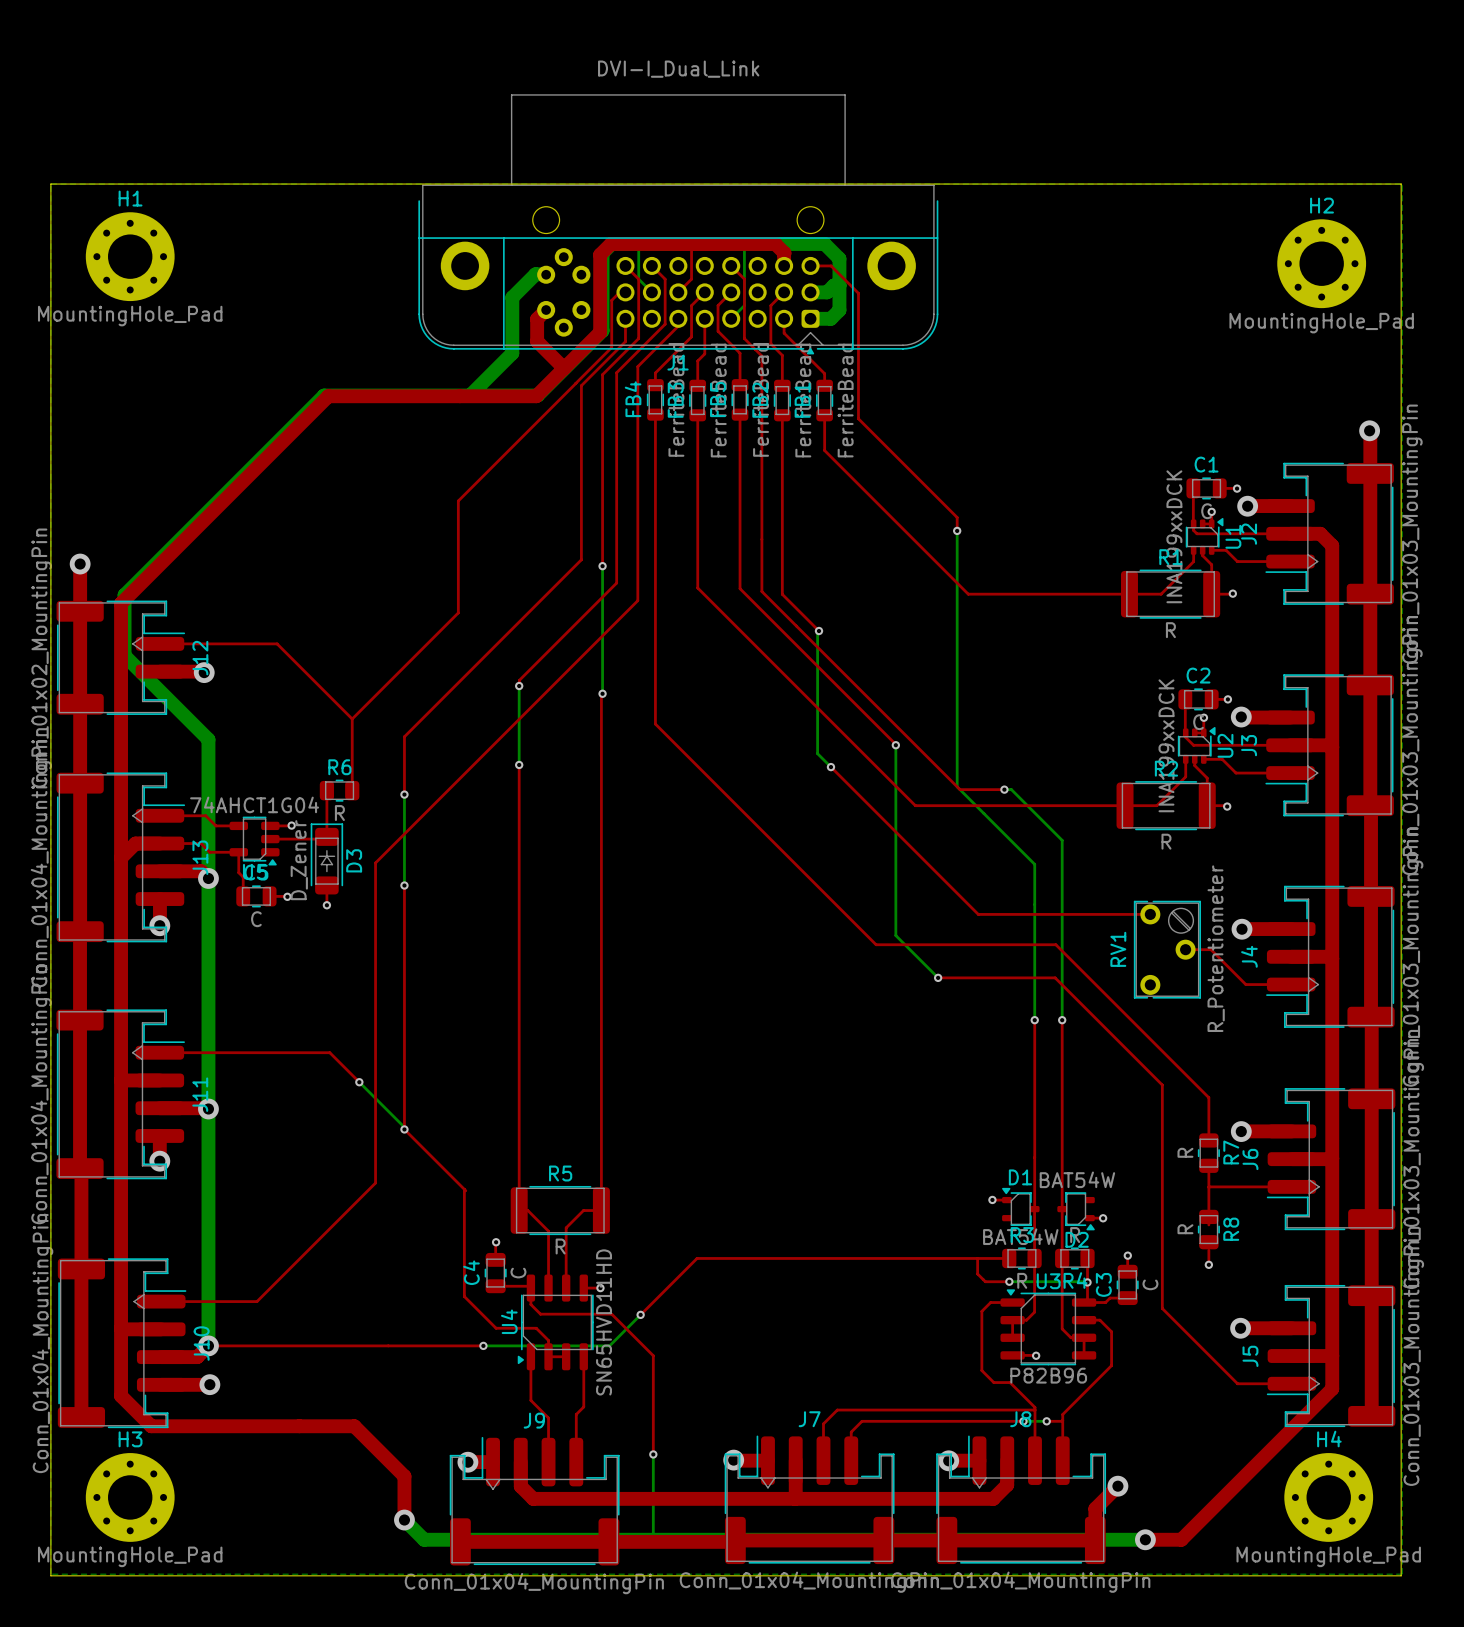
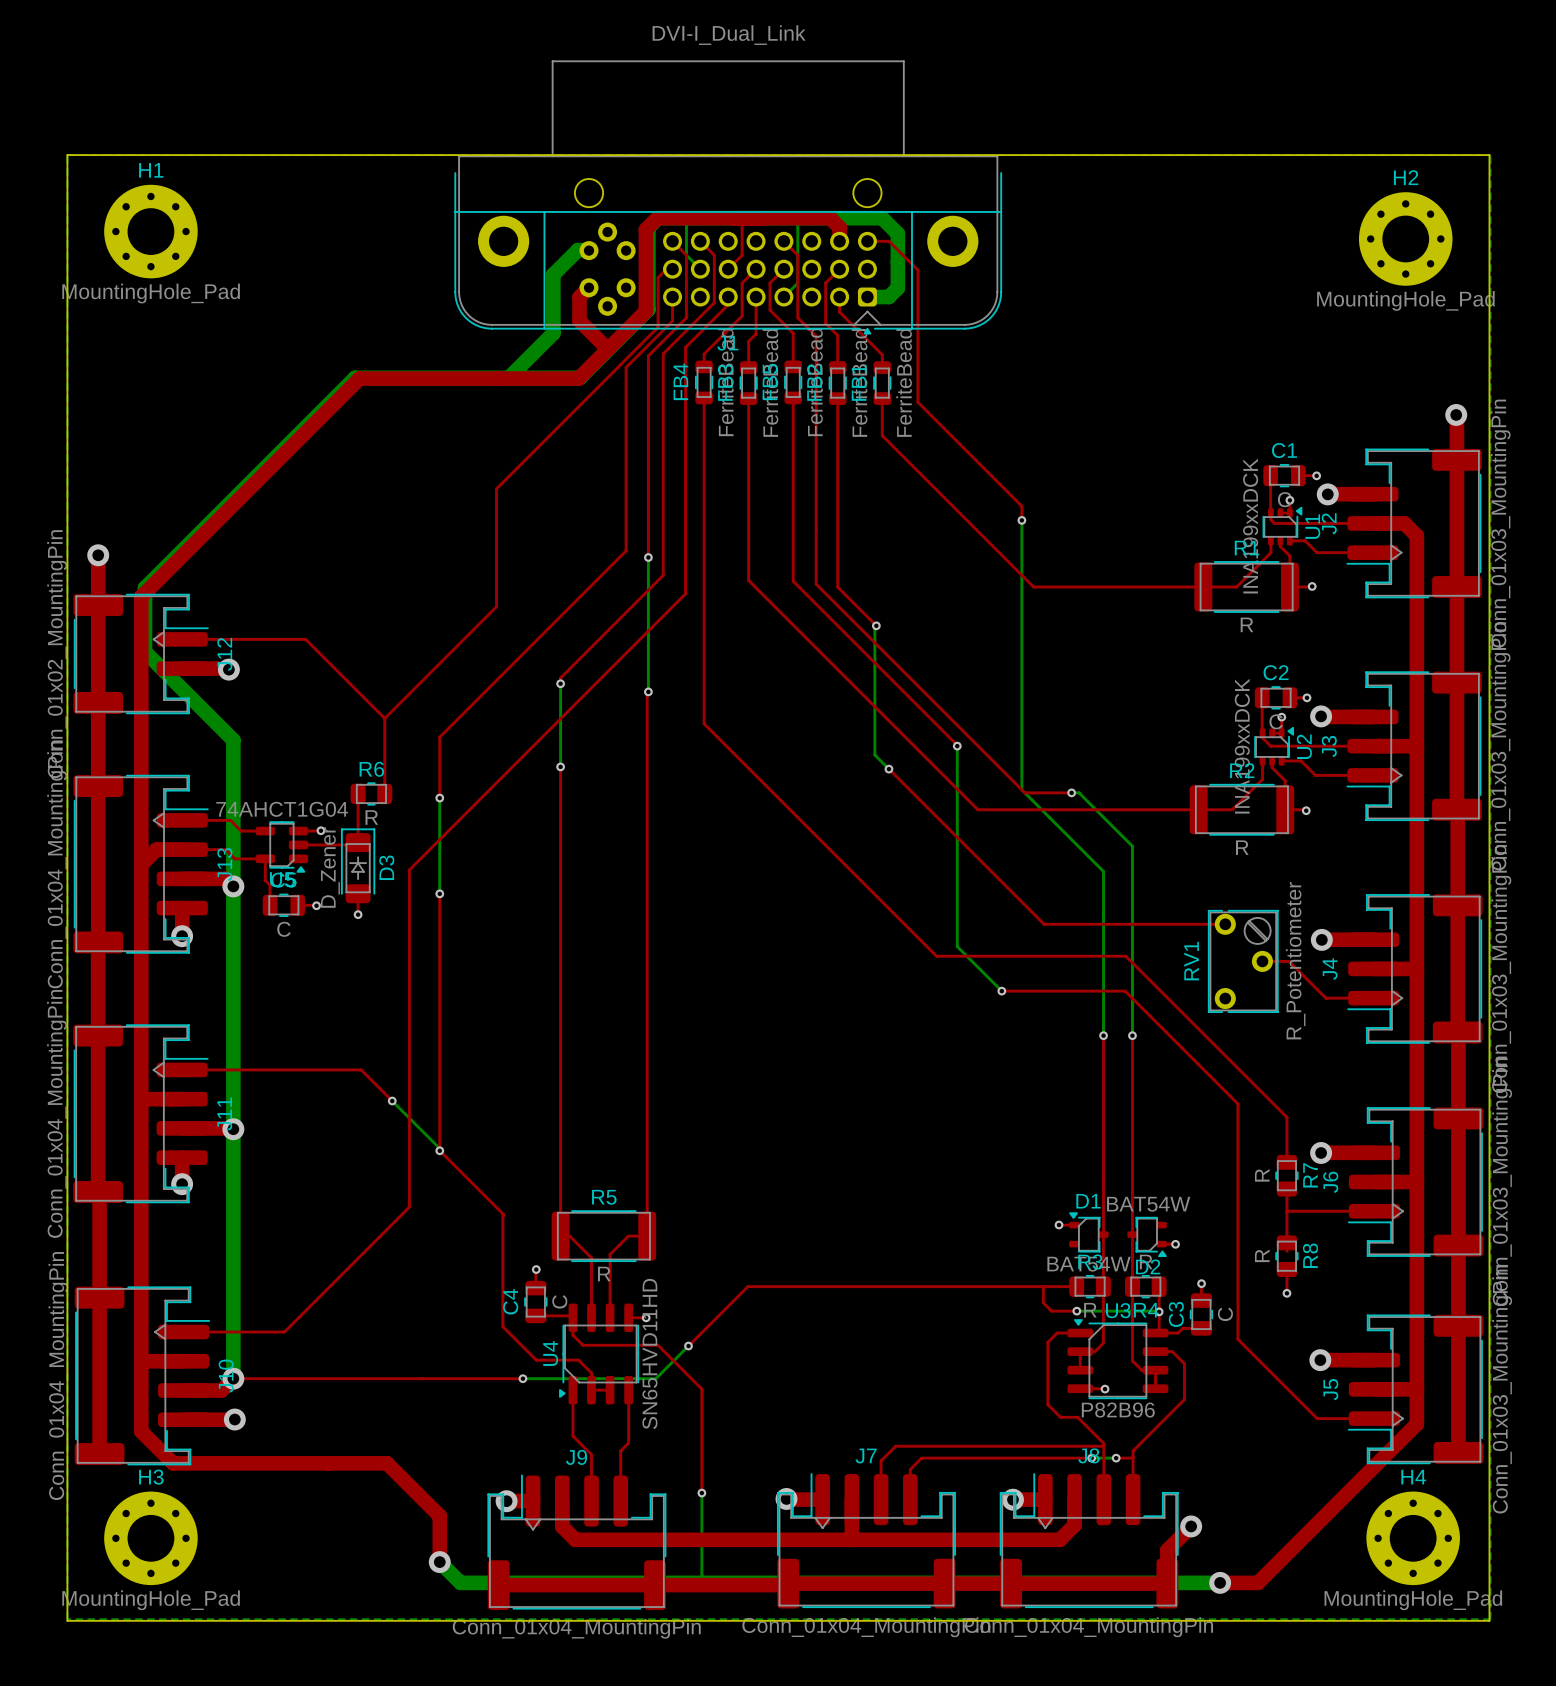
bottom track: (839, 285) (833, 285) (826, 292) (810, 292) -> none

